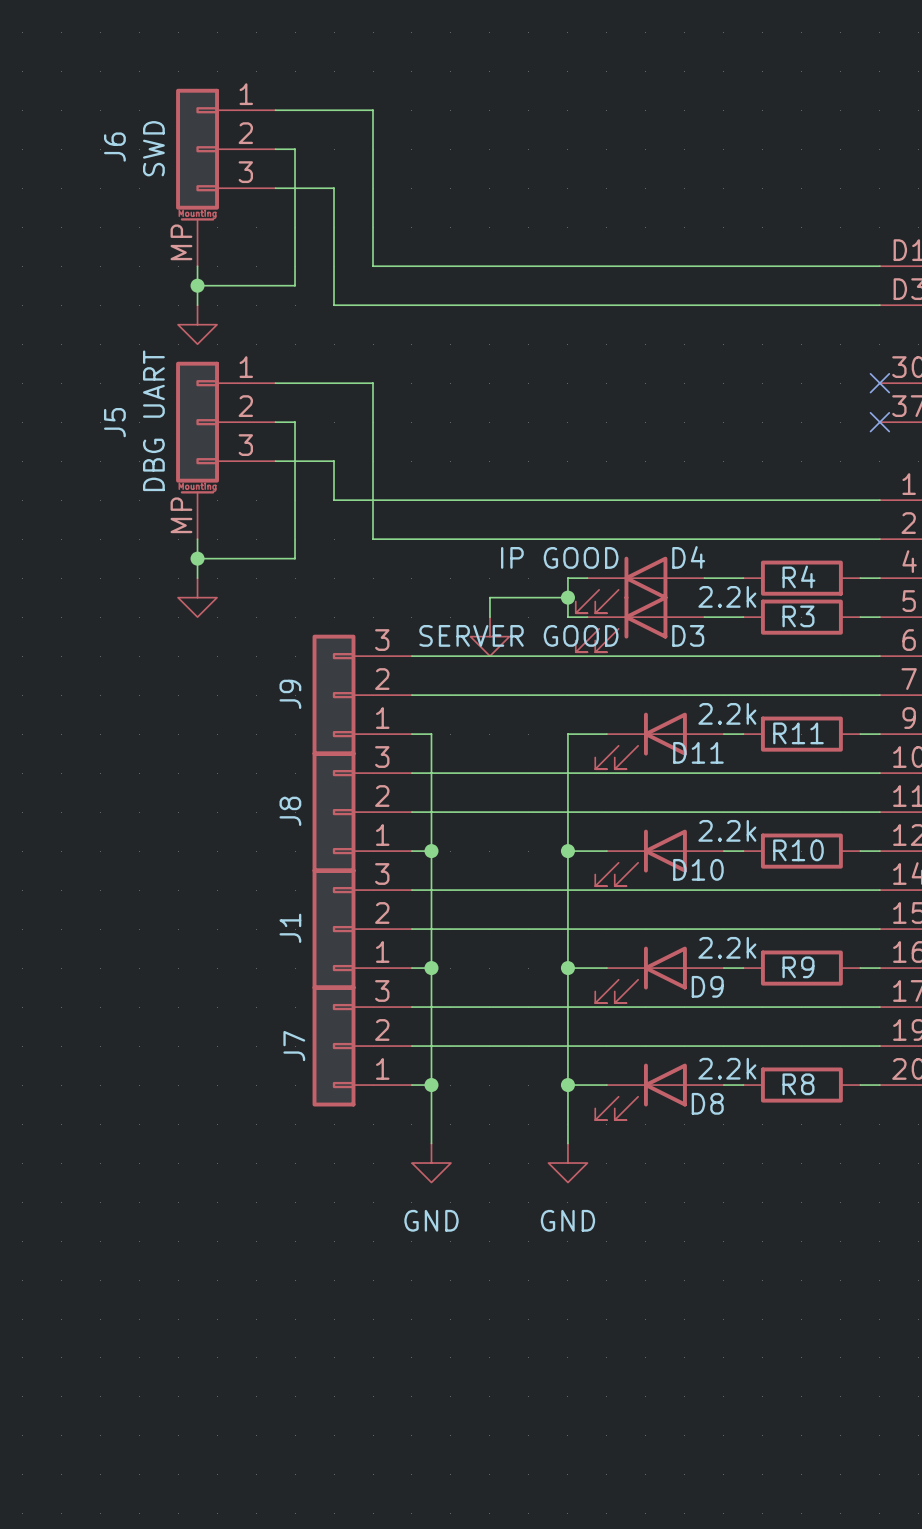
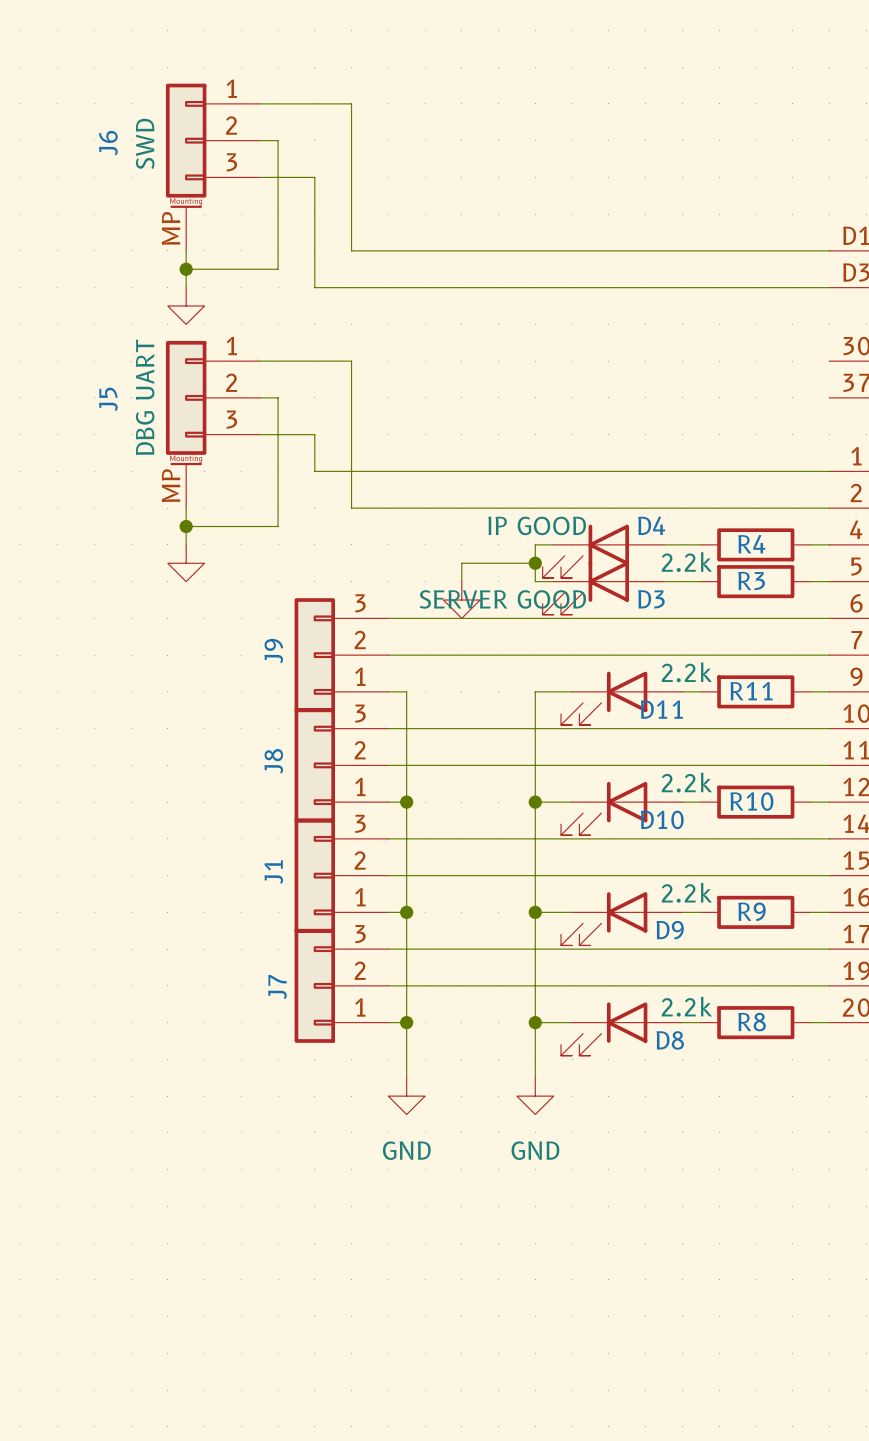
no-connect mark: (879, 383) -> none
no-connect mark: (879, 422) -> none

